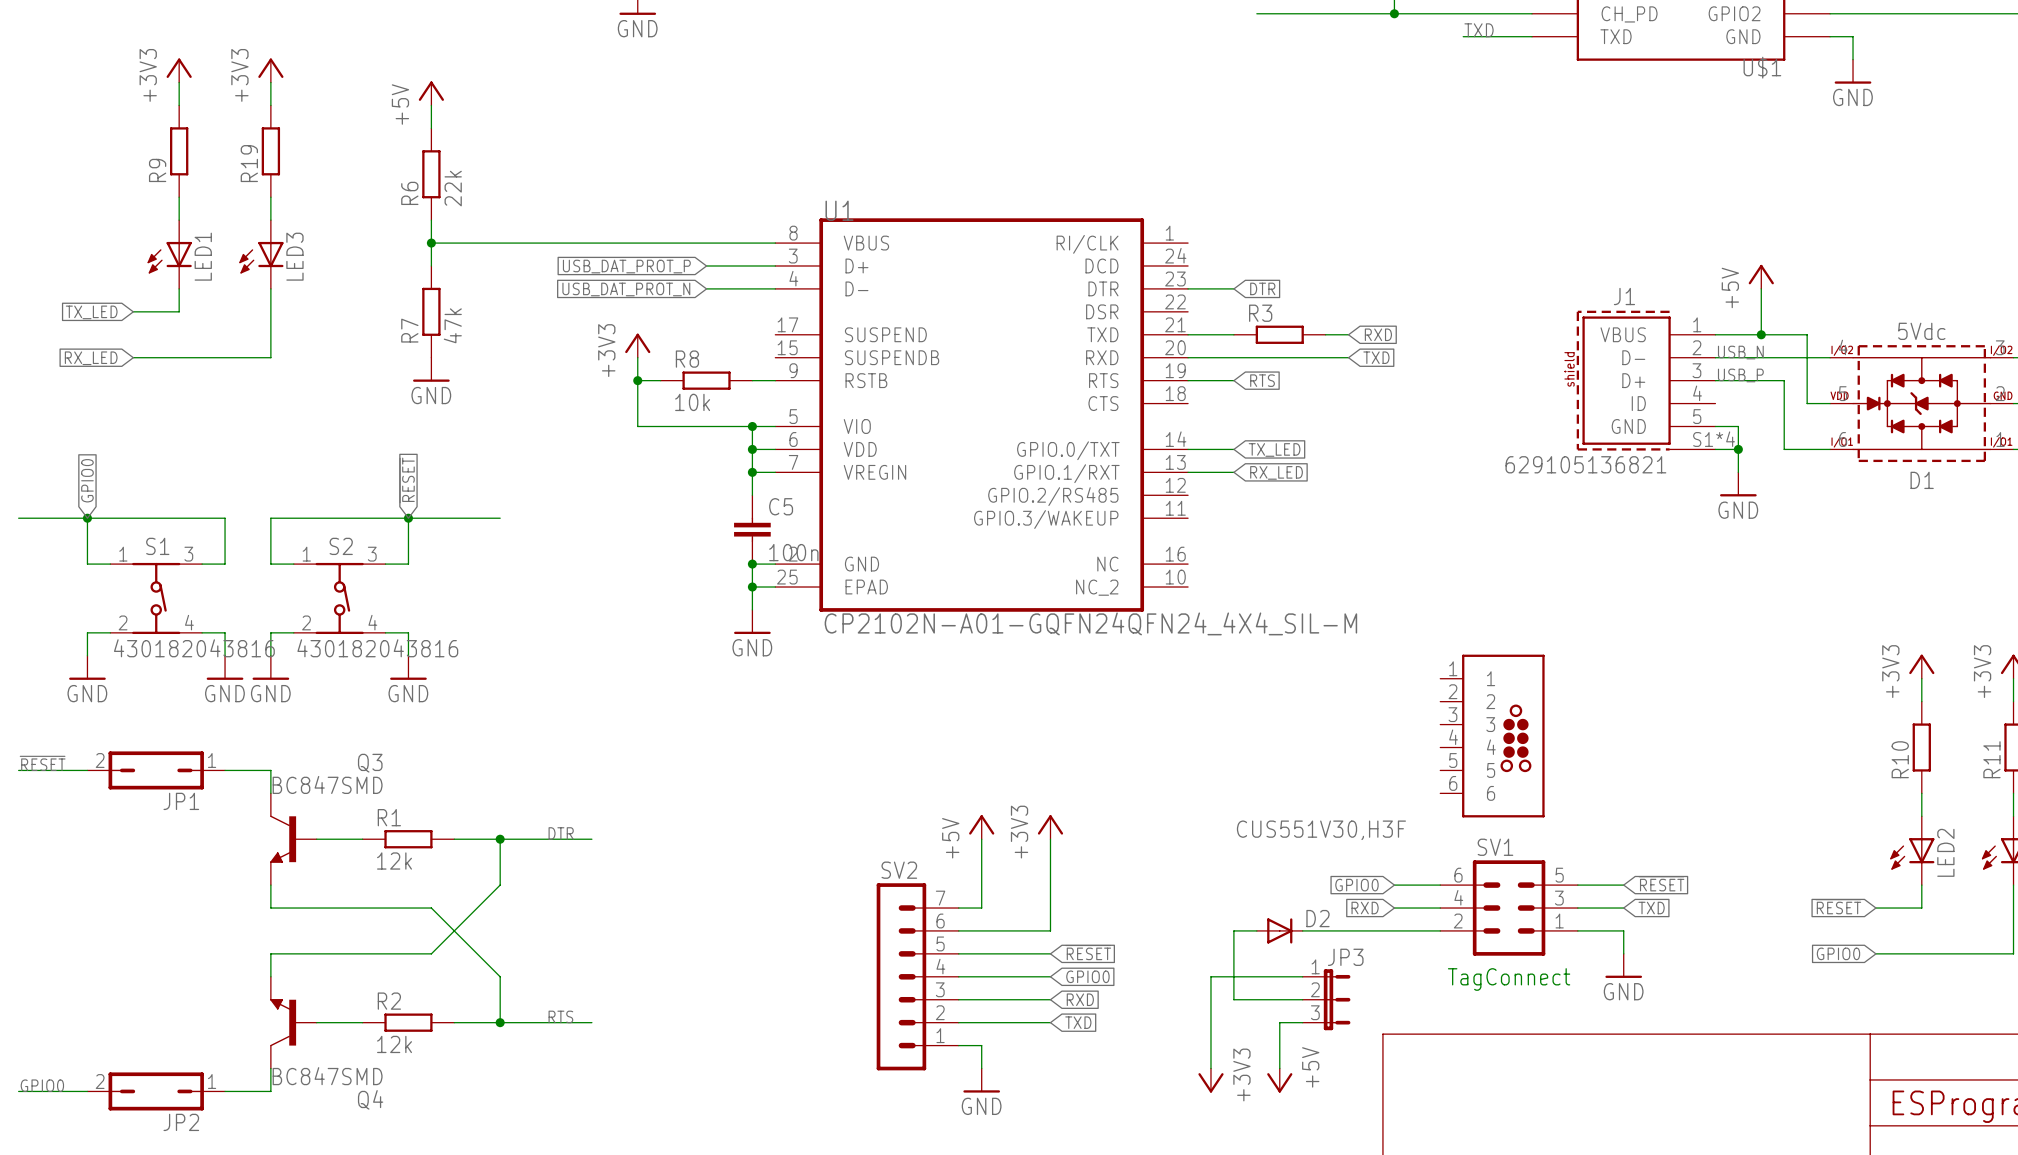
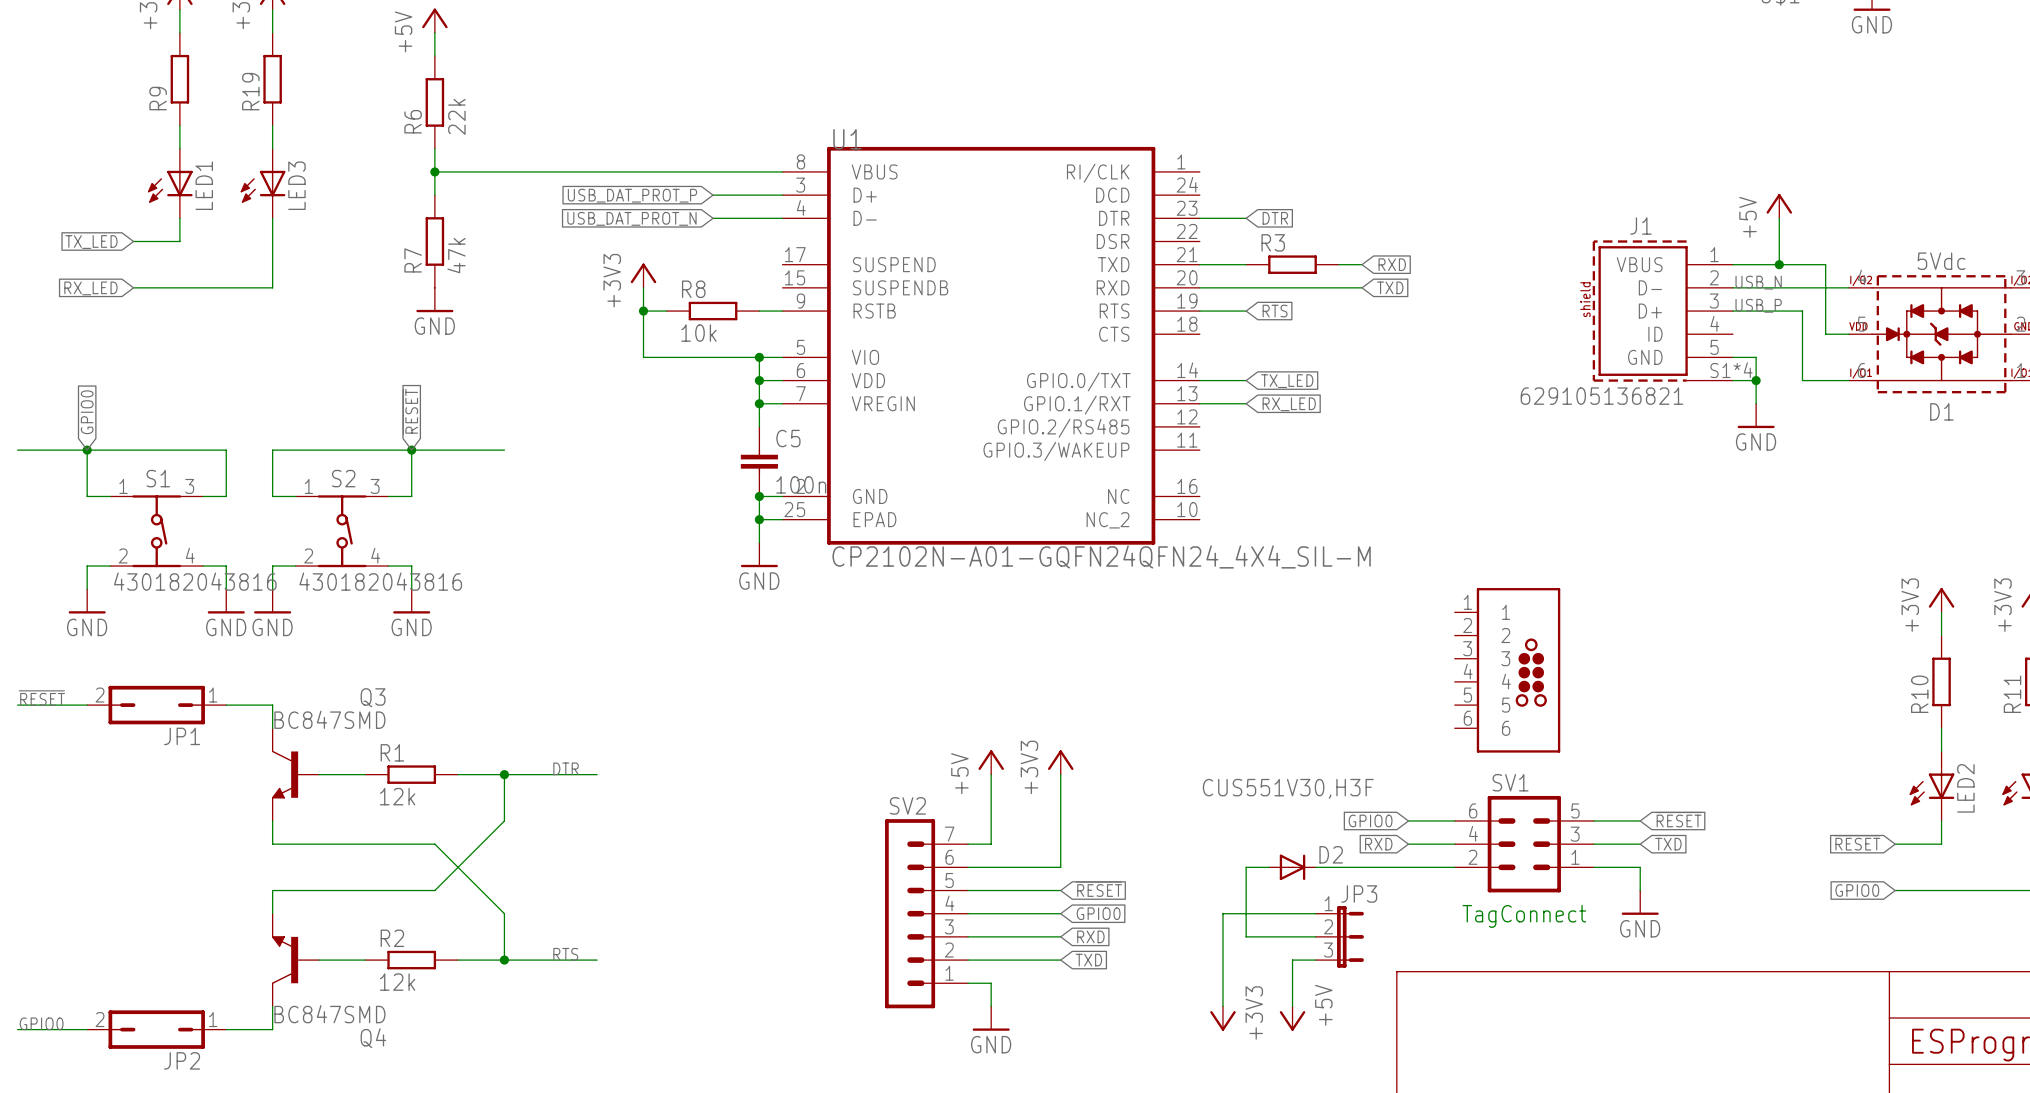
D2 value position: CUS551V30,H3F (1321, 830) -> CUS551V30,H3F (1288, 788)

